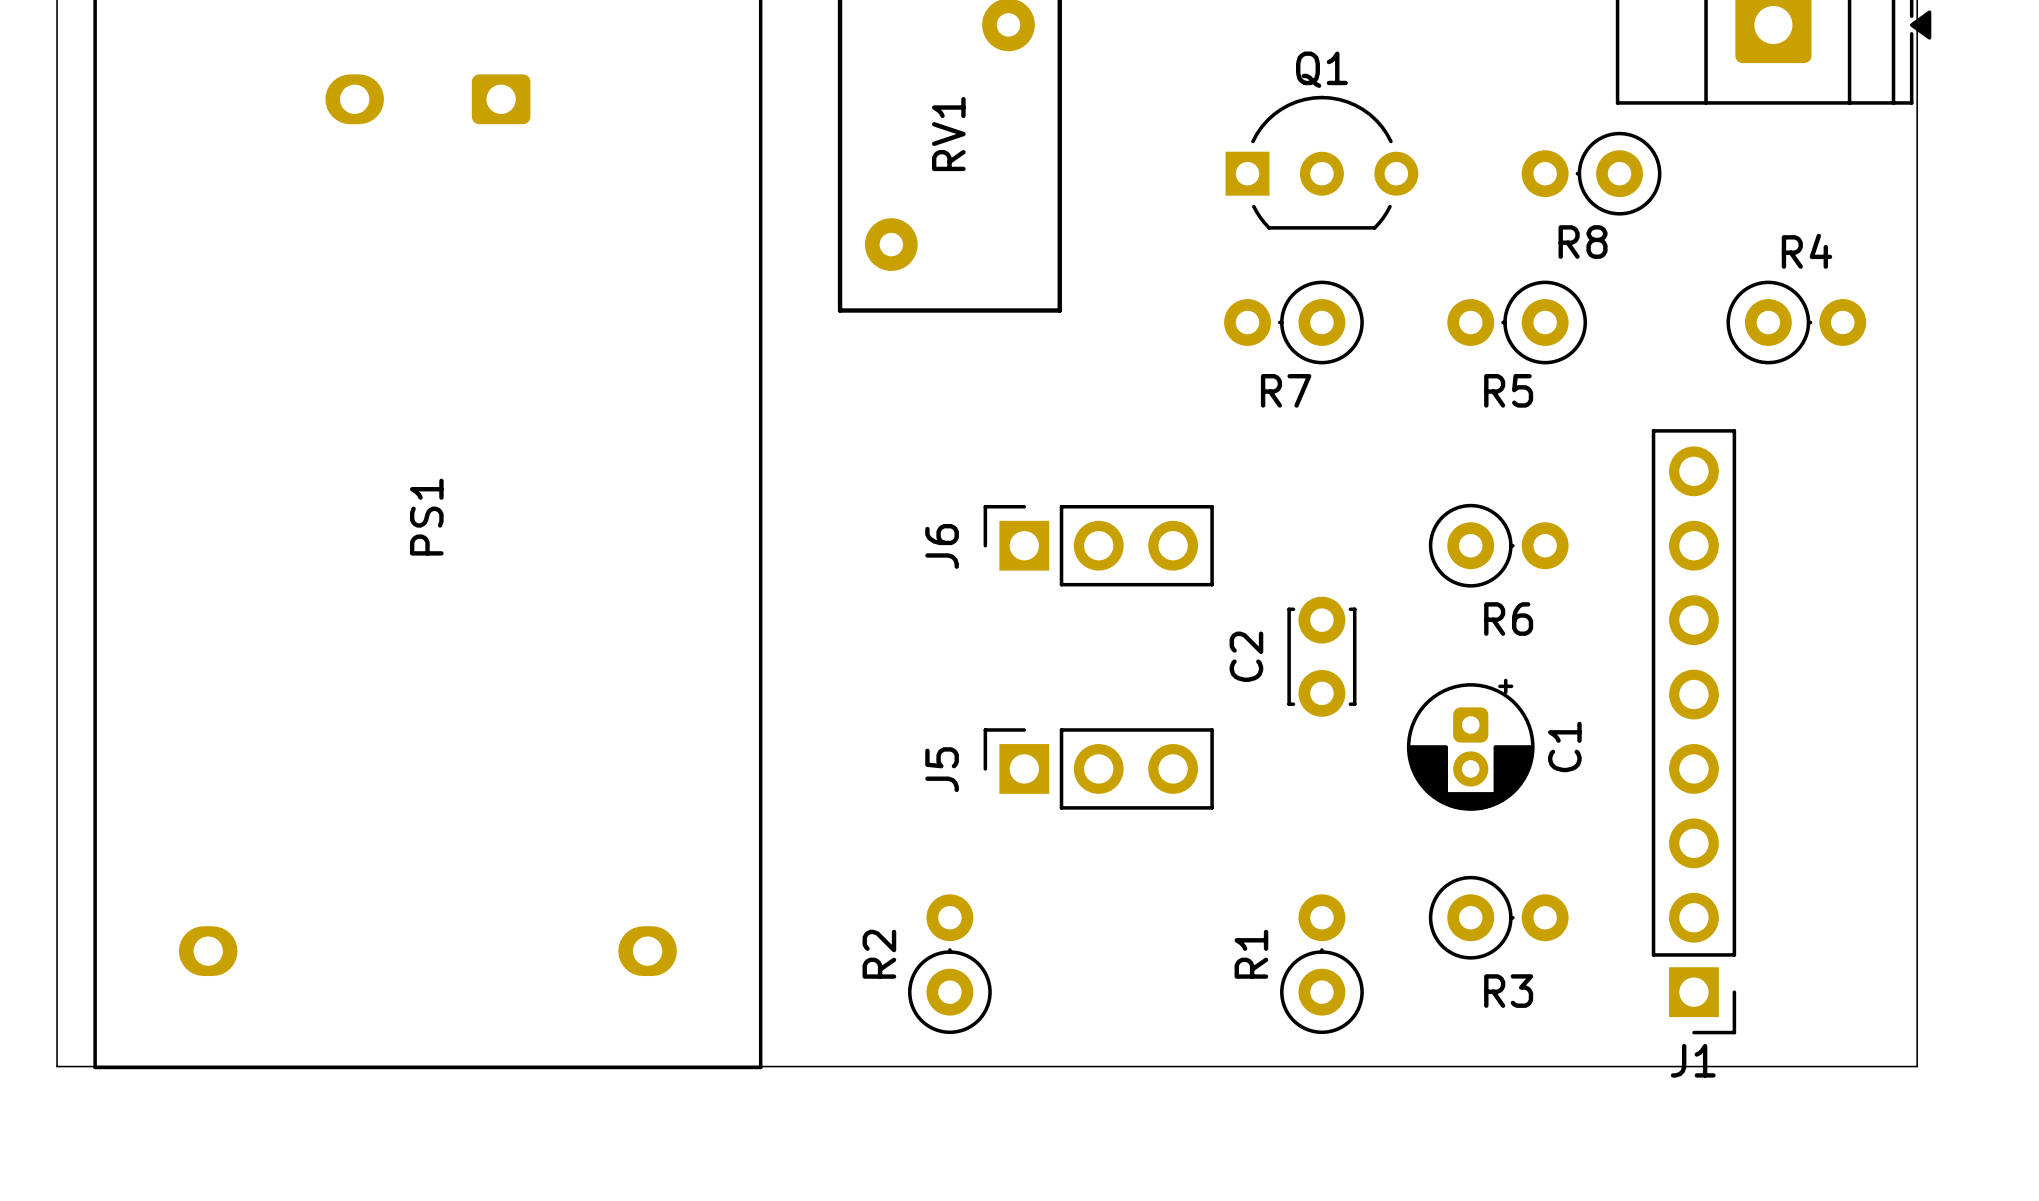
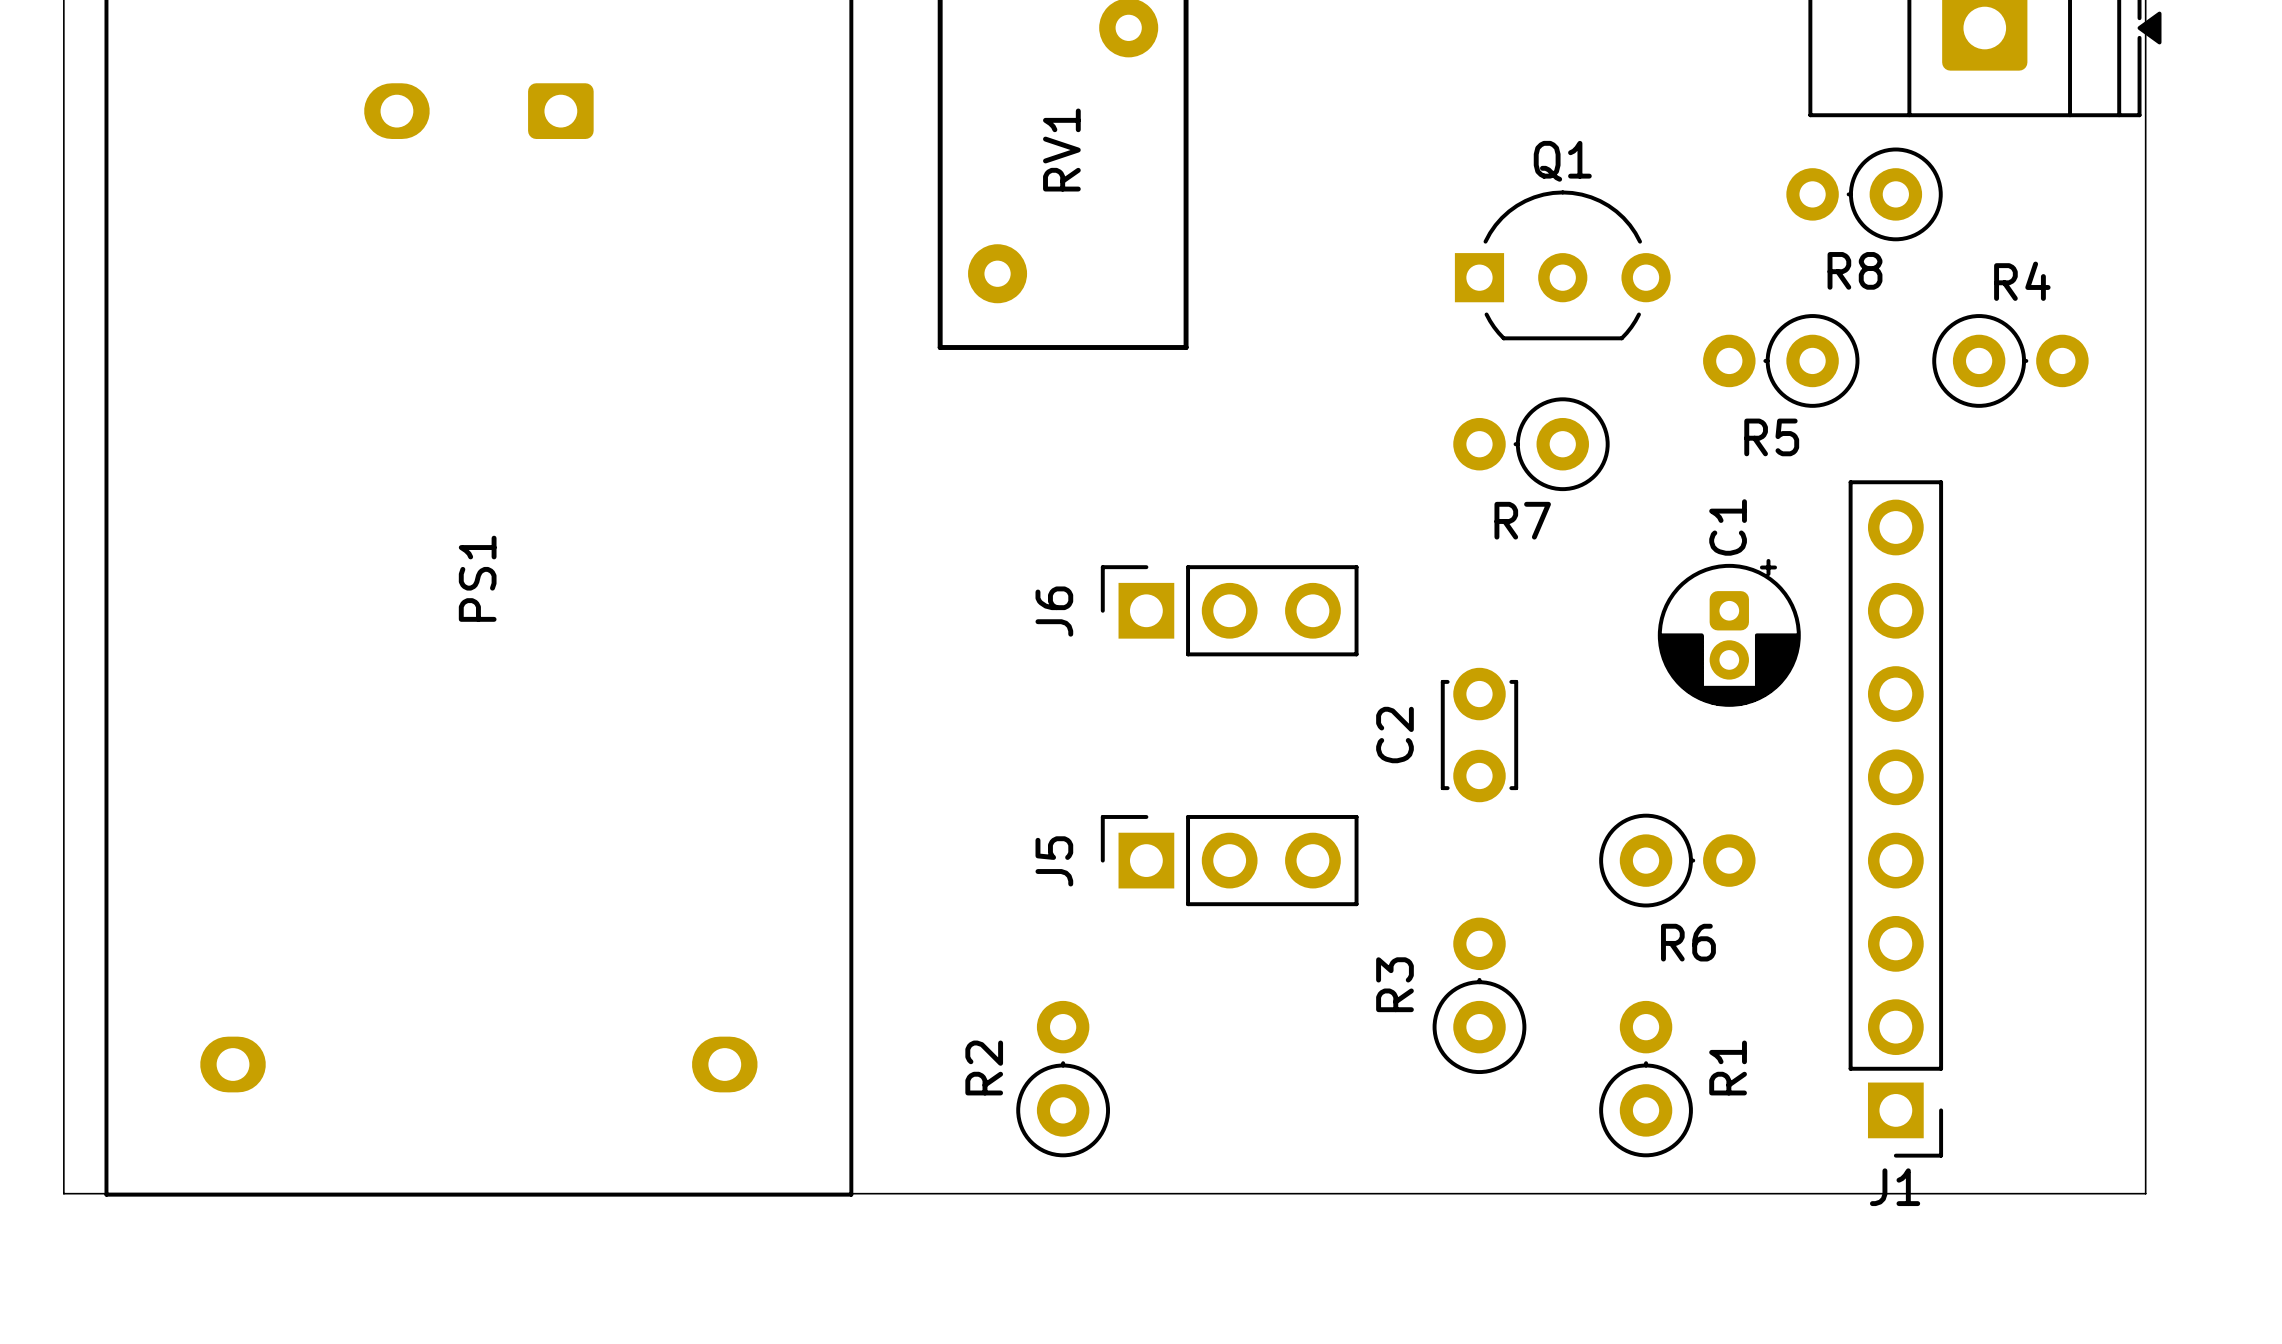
Q1 position: (1321, 162) -> (1562, 265)
R8 position: (1591, 173) -> (1864, 194)
R7 position: (1293, 322) -> (1531, 444)
R5 position: (1517, 322) -> (1781, 360)
R6 position: (1498, 545) -> (1677, 860)
C1 position: (1470, 744) -> (1729, 632)
C1 name position: C1 (1564, 746) -> C1 (1728, 527)
R3 rotation: 0° (1498, 917) -> 90° counterclockwise (1479, 995)
R3 position: (1498, 917) -> (1479, 995)
R1 name position: R1 (1251, 954) -> R1 (1728, 1067)
R1 position: (1321, 964) -> (1646, 1079)
R3 name position: R3 (1508, 991) -> R3 (1394, 984)

